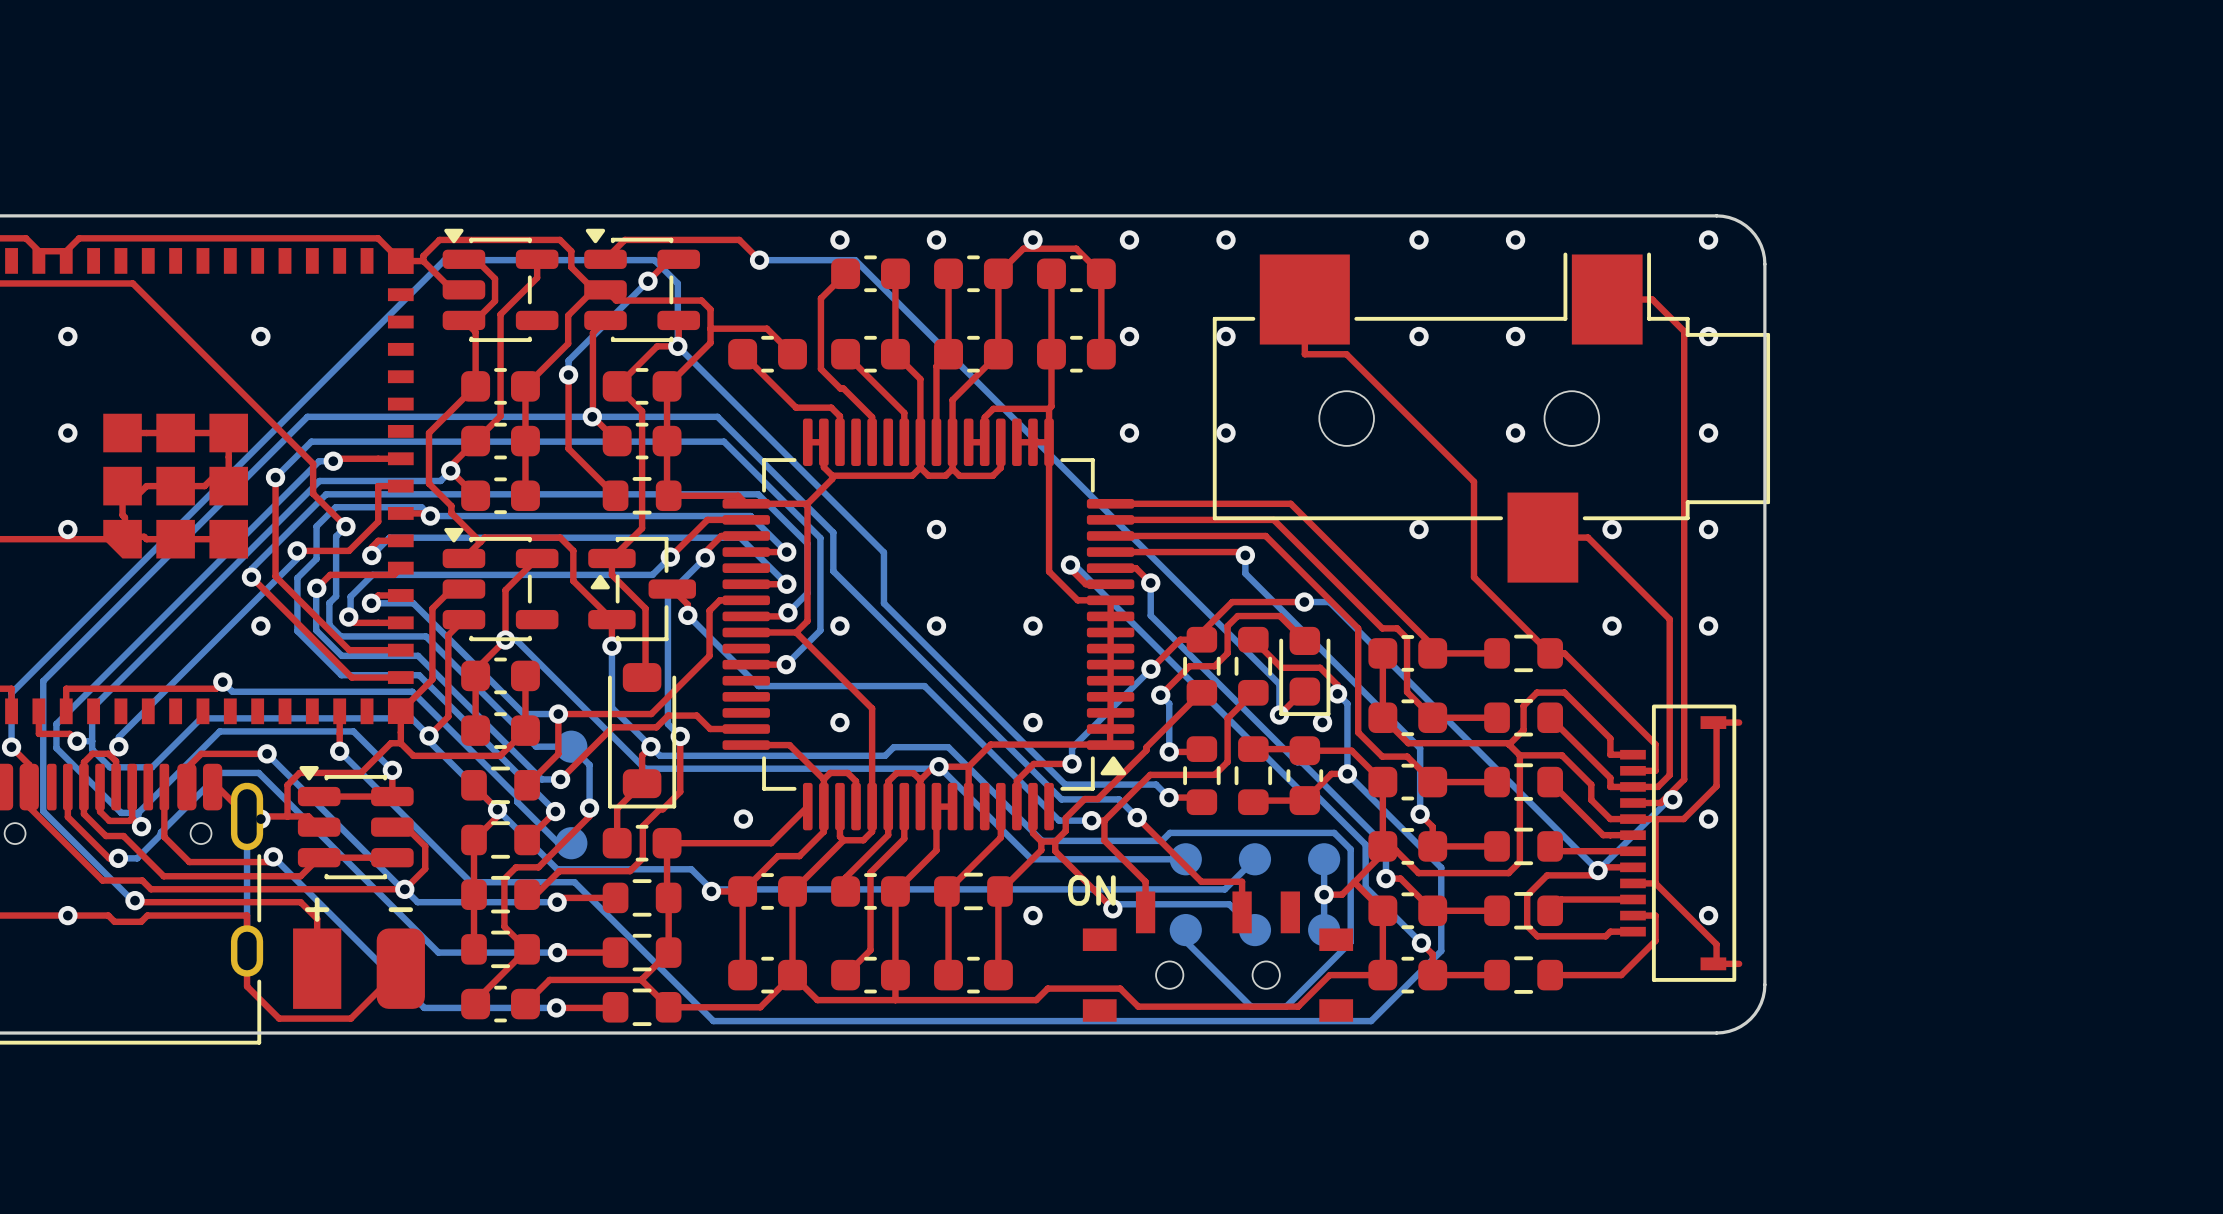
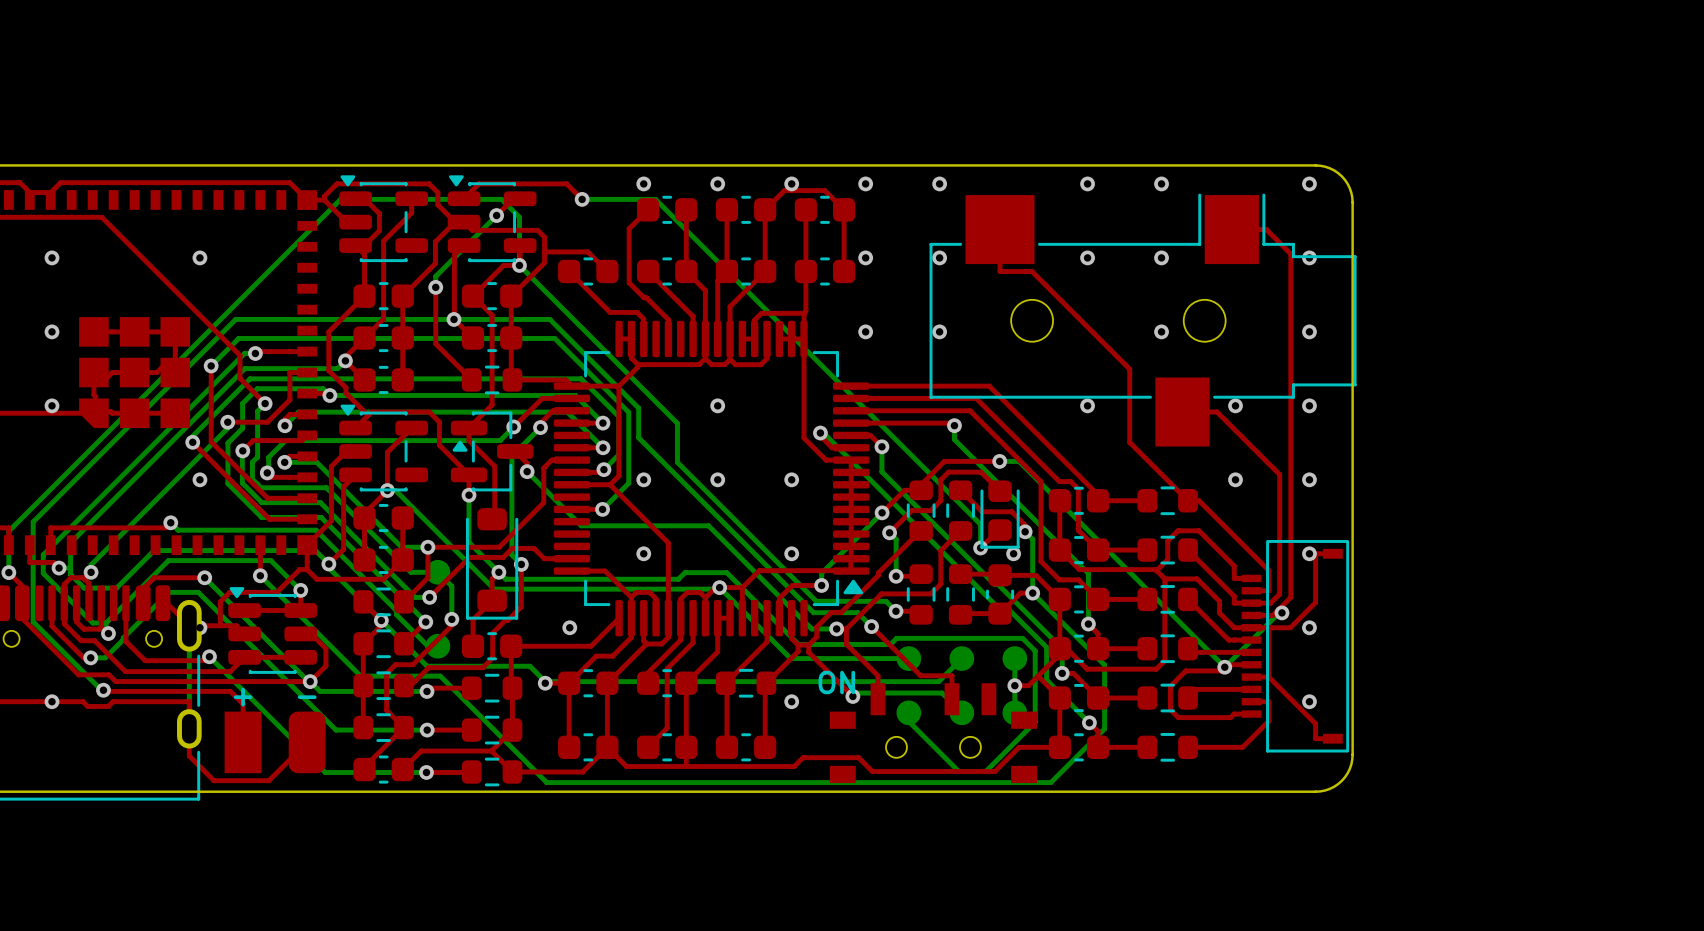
part footprint: [1620, 704, 1737, 982] -> [1241, 539, 1350, 753]
via: none -> (1309, 553)

